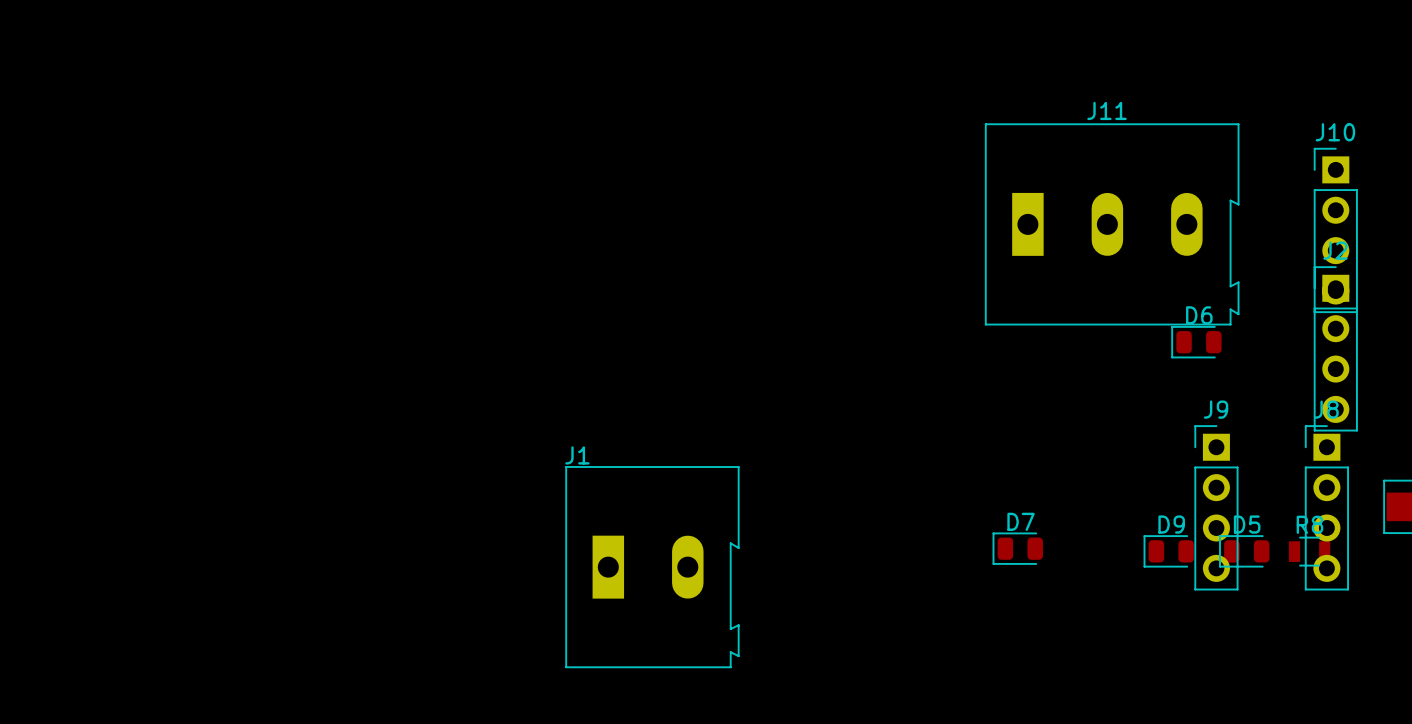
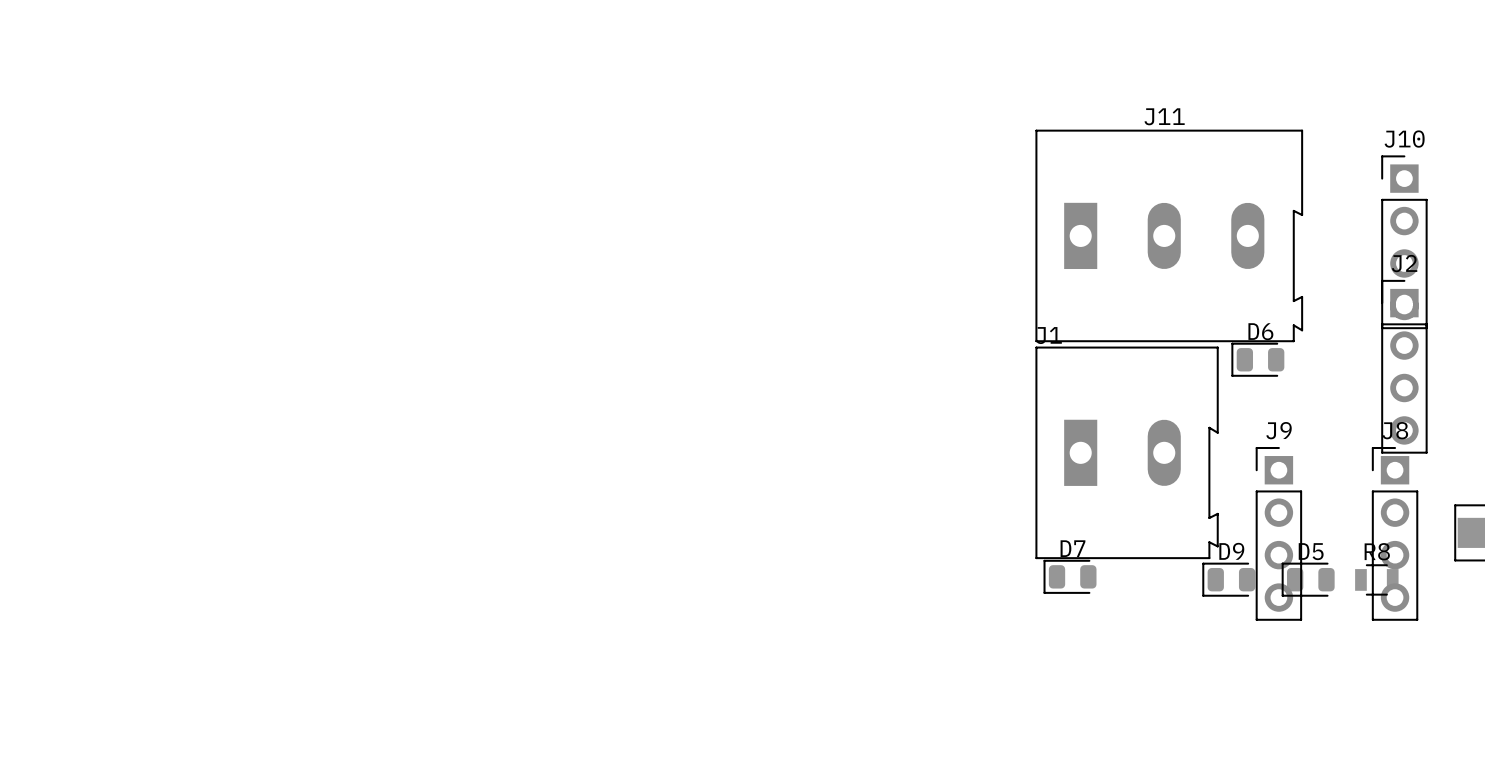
J1 position: (652, 567) -> (1127, 452)

